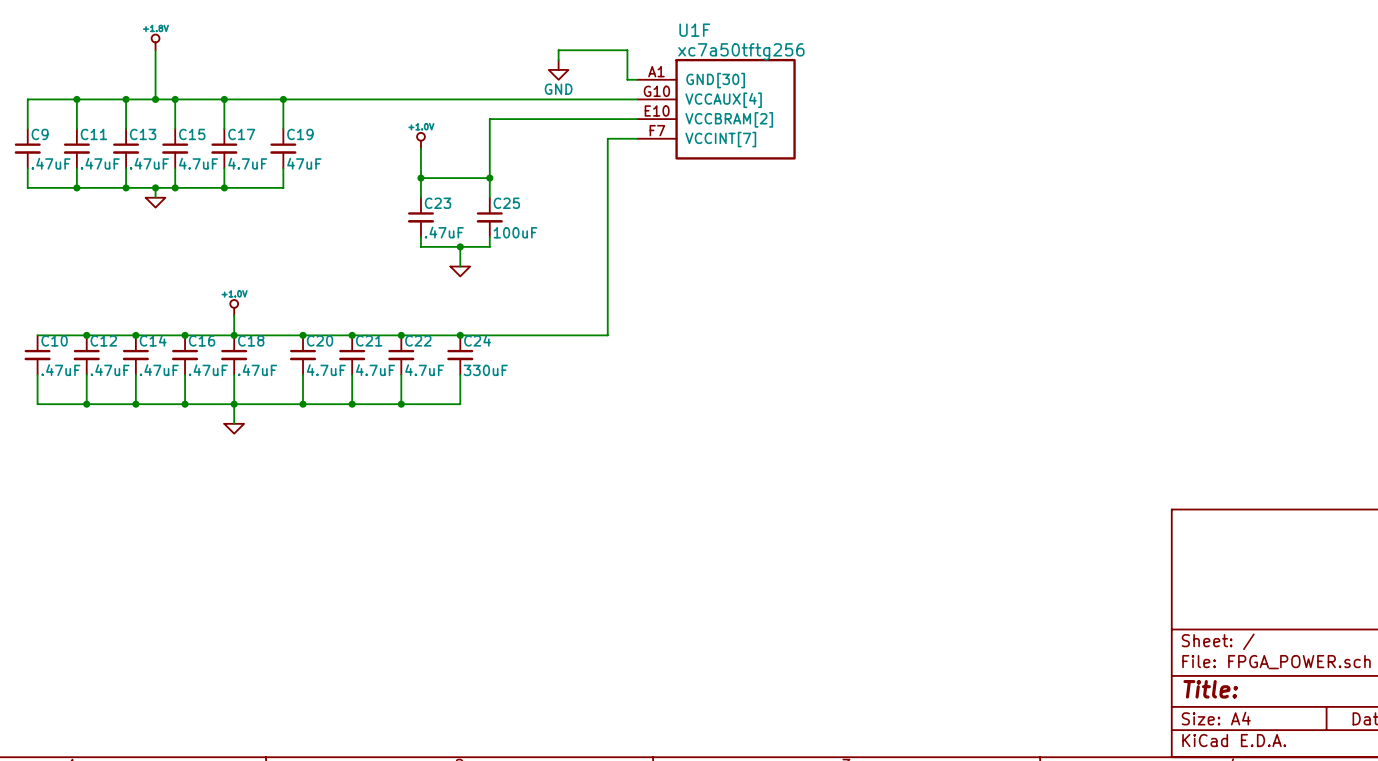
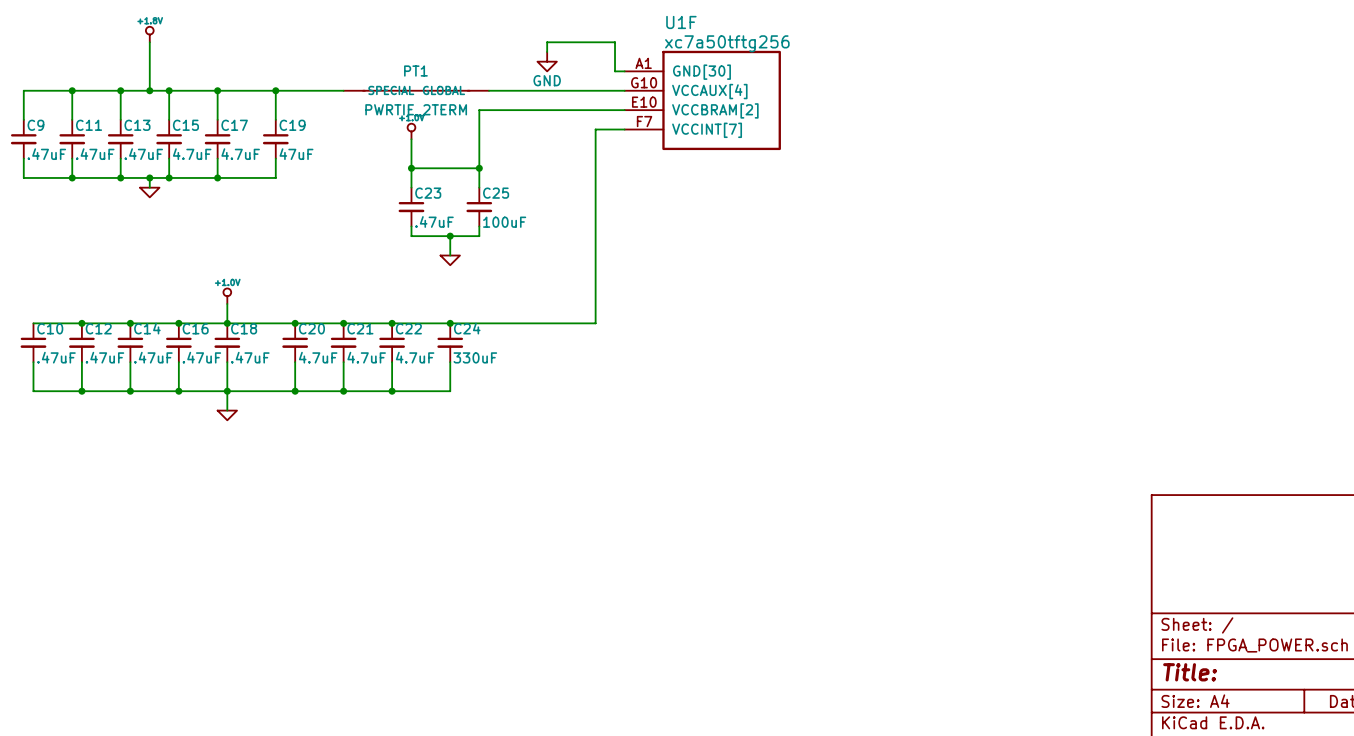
PT1: none -> PWRTIE_2TERM (416, 90)

